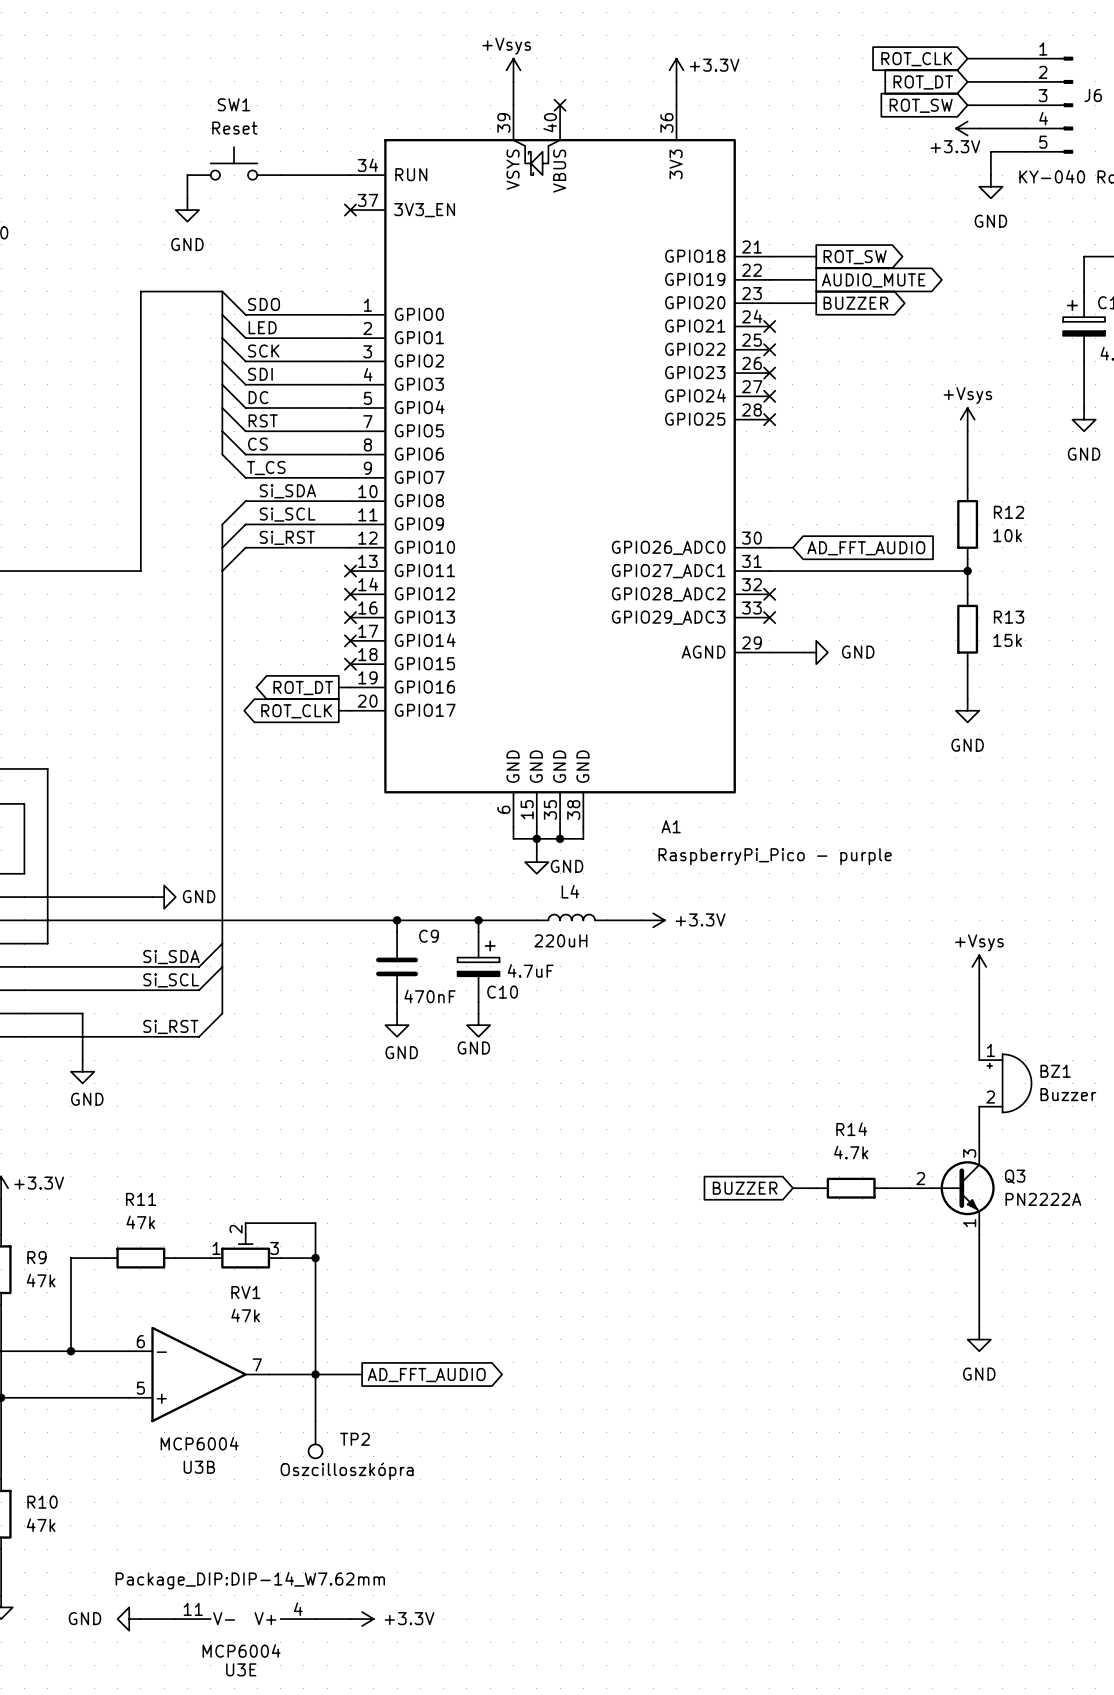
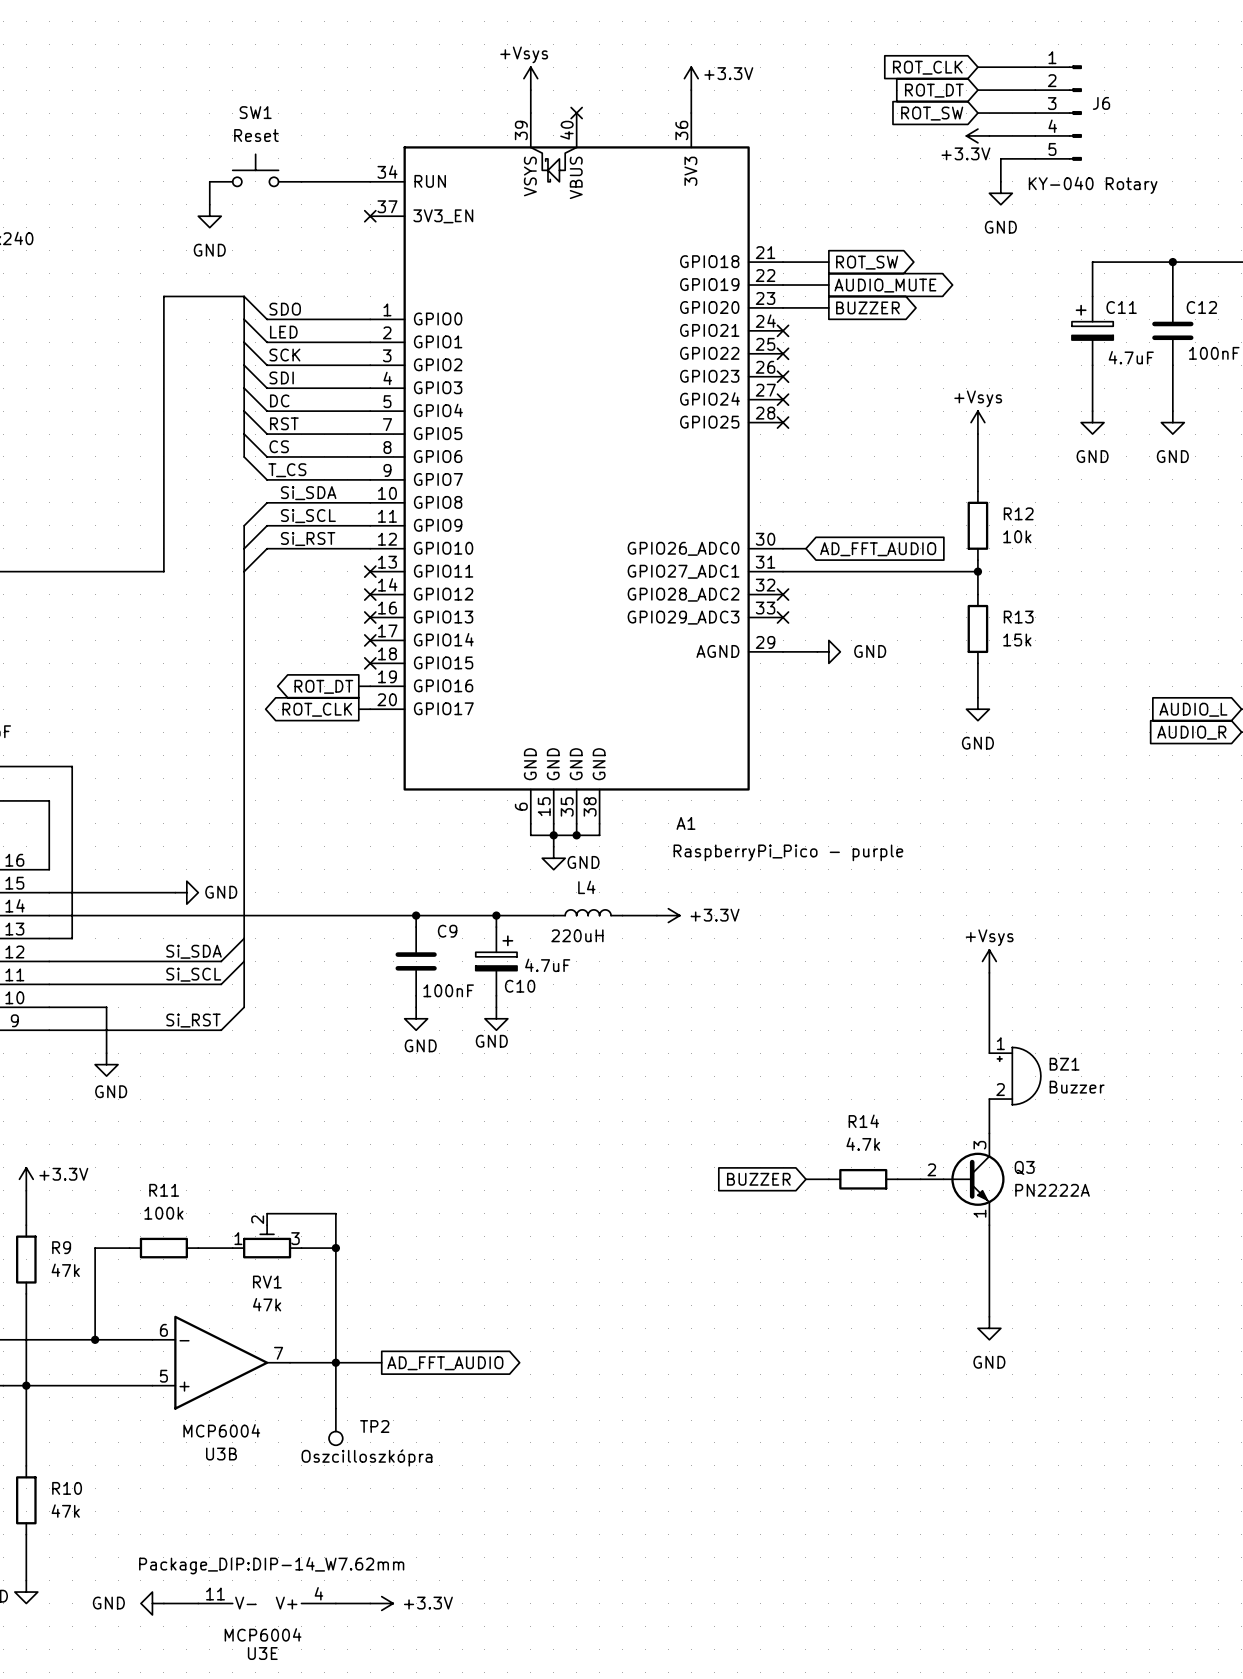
C9 value: 470nF (430, 996) -> 100nF (448, 990)
R11 value: 47k (140, 1222) -> 100k (163, 1213)

